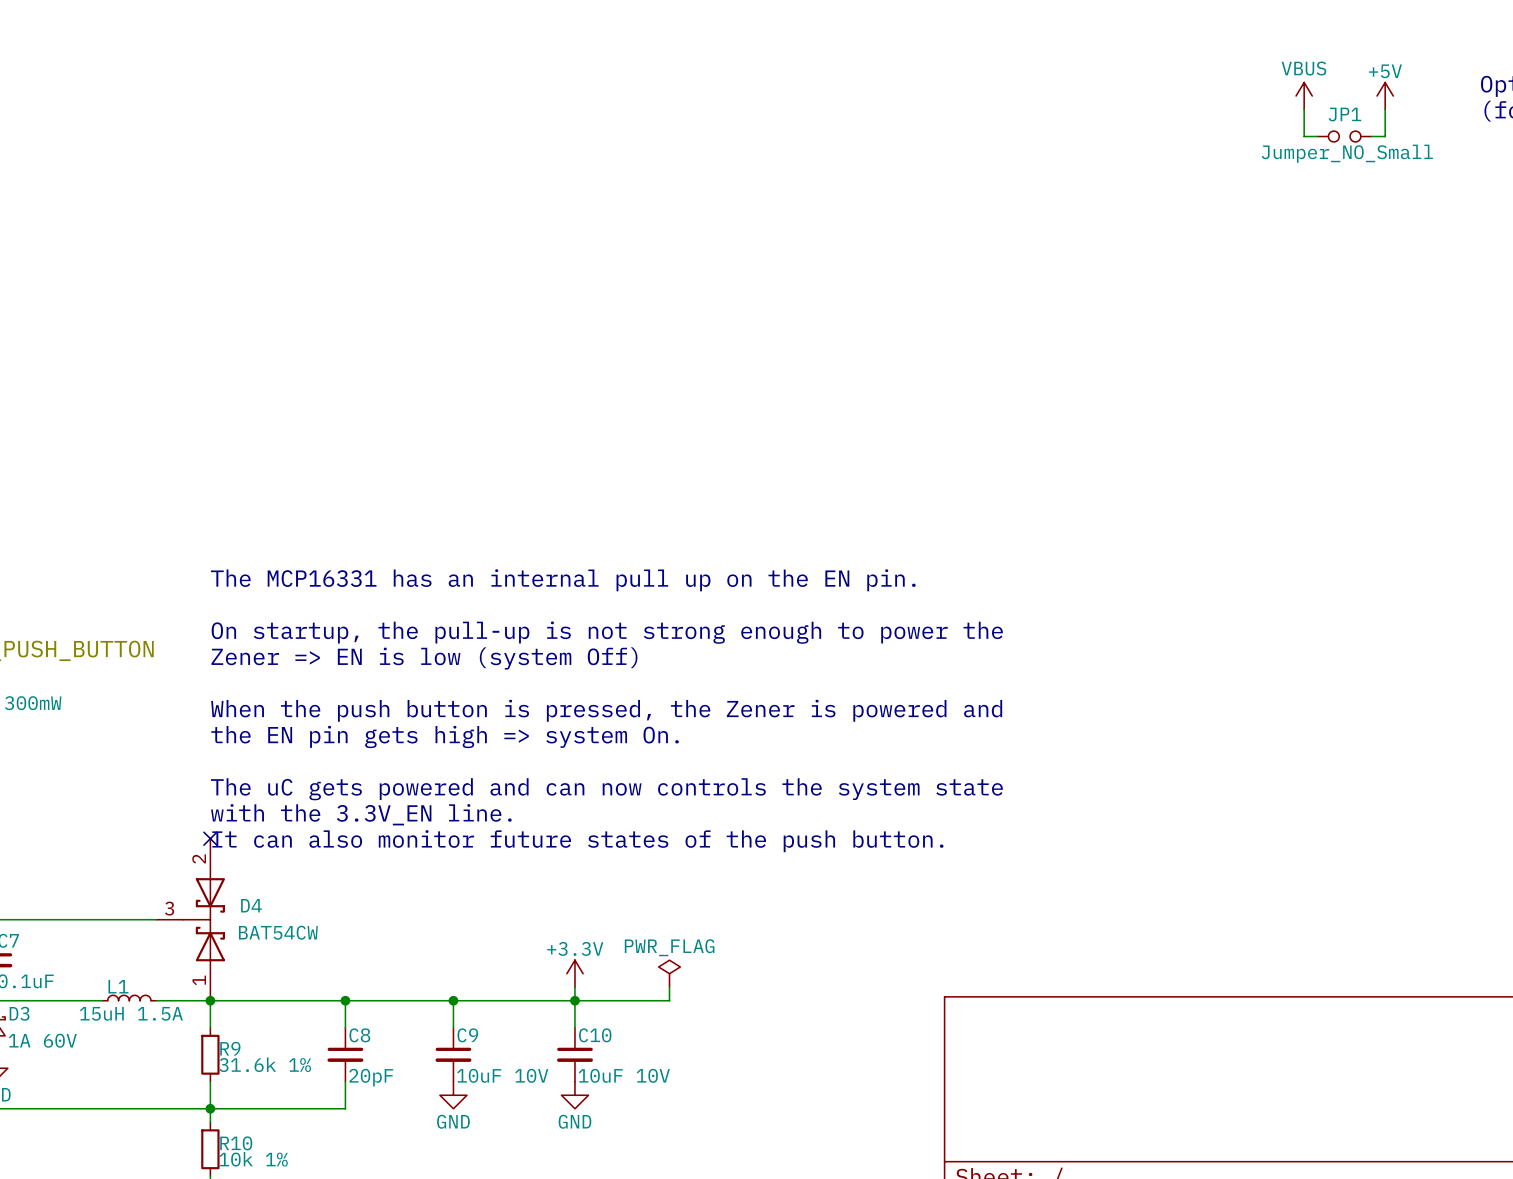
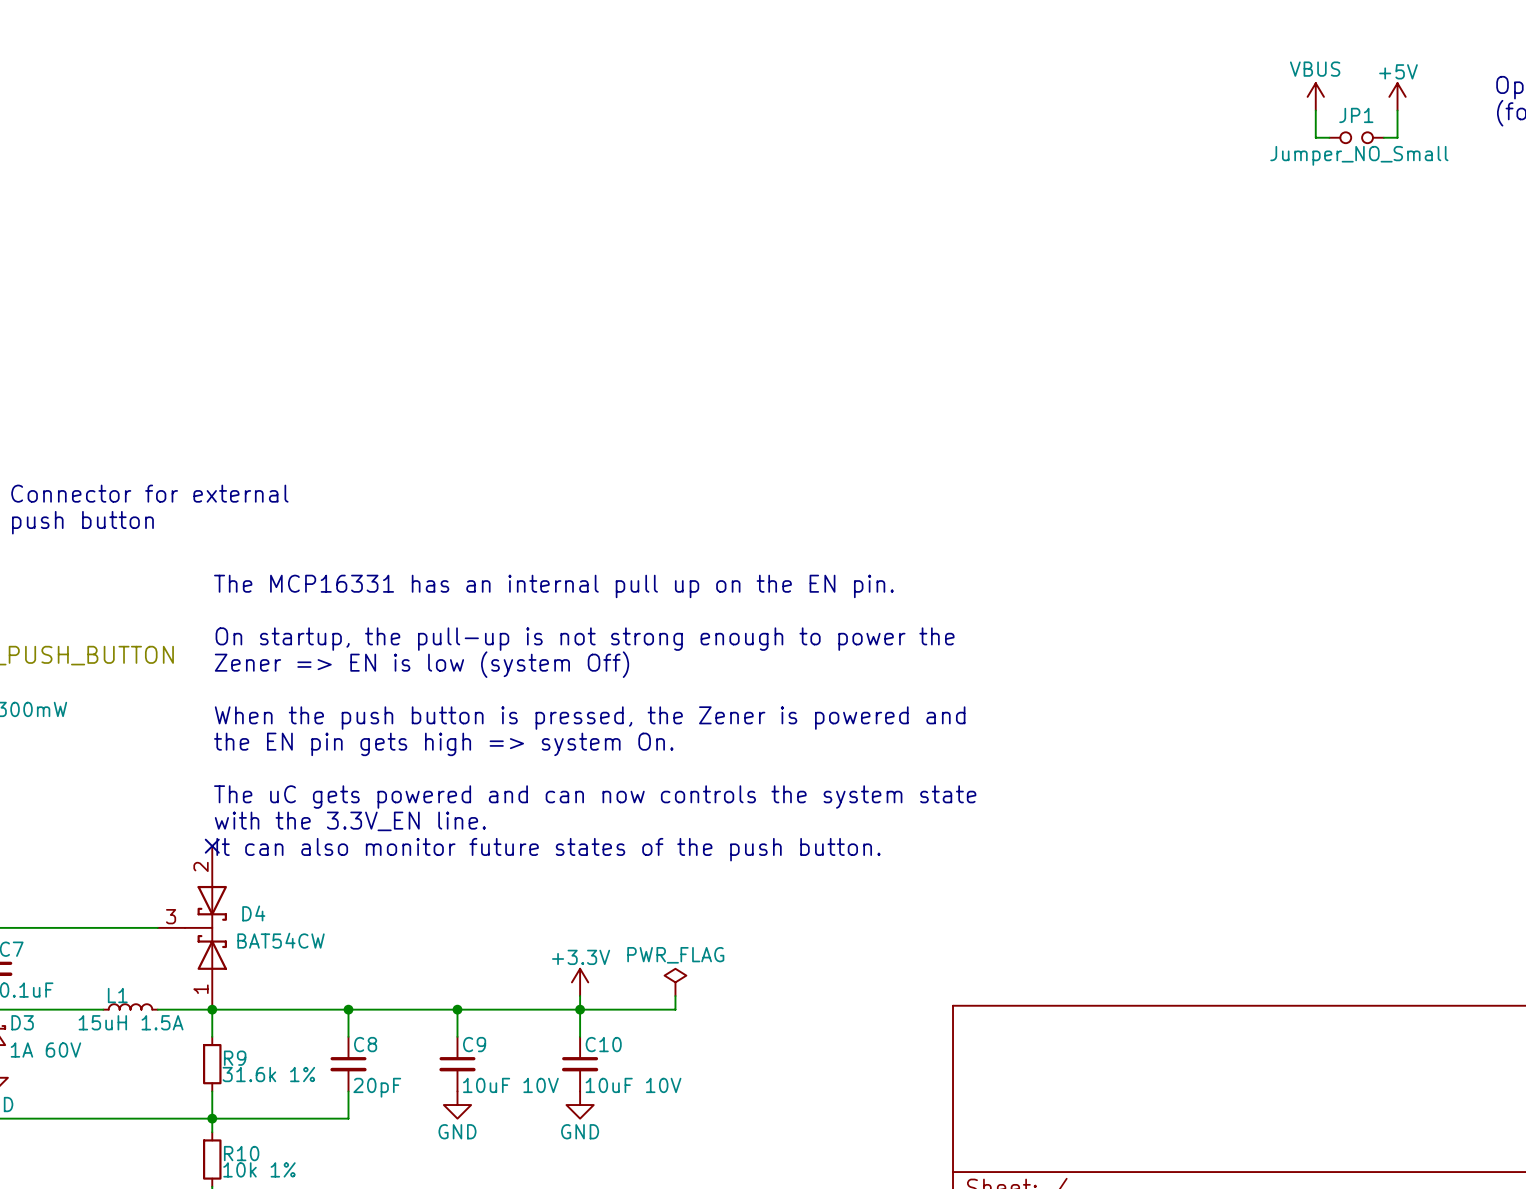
text: none -> Connector for external (149, 493)
text: none -> push button (82, 522)

